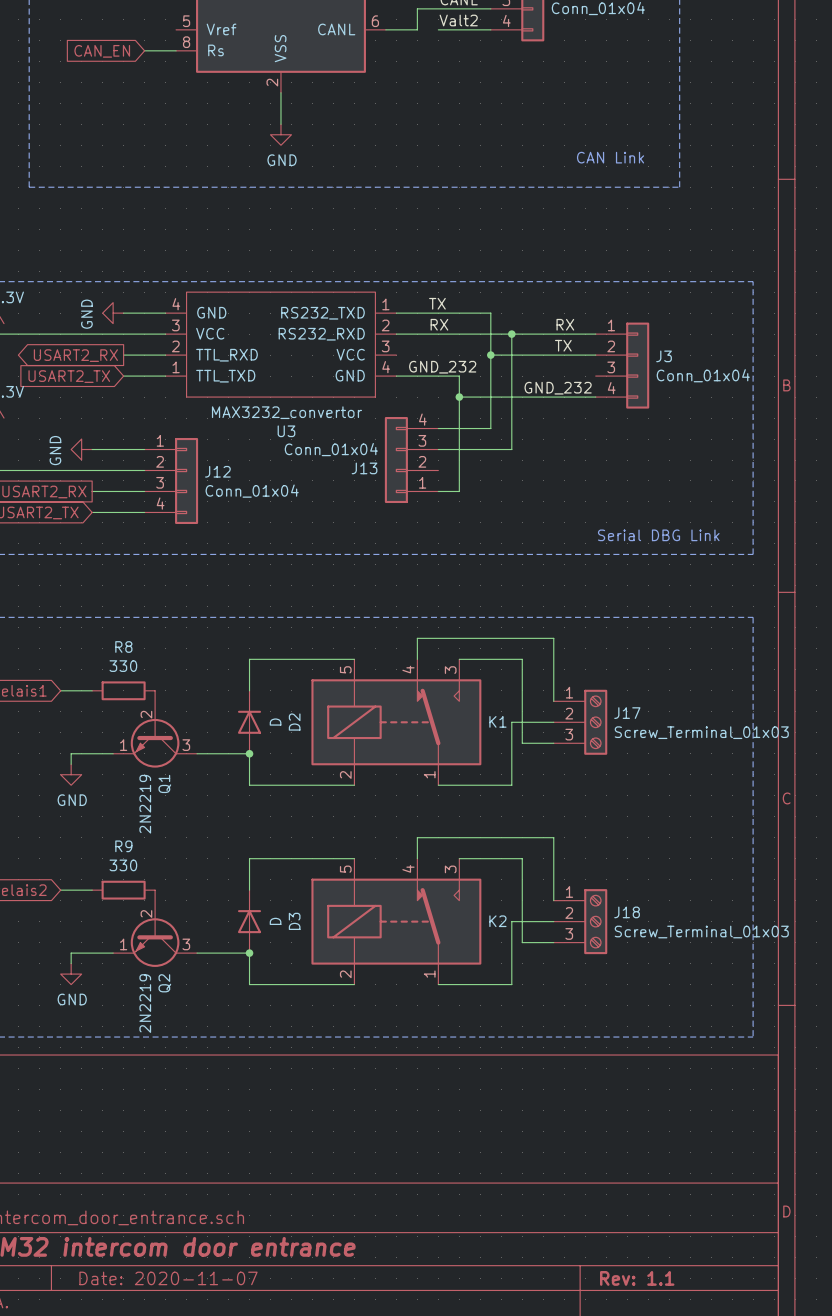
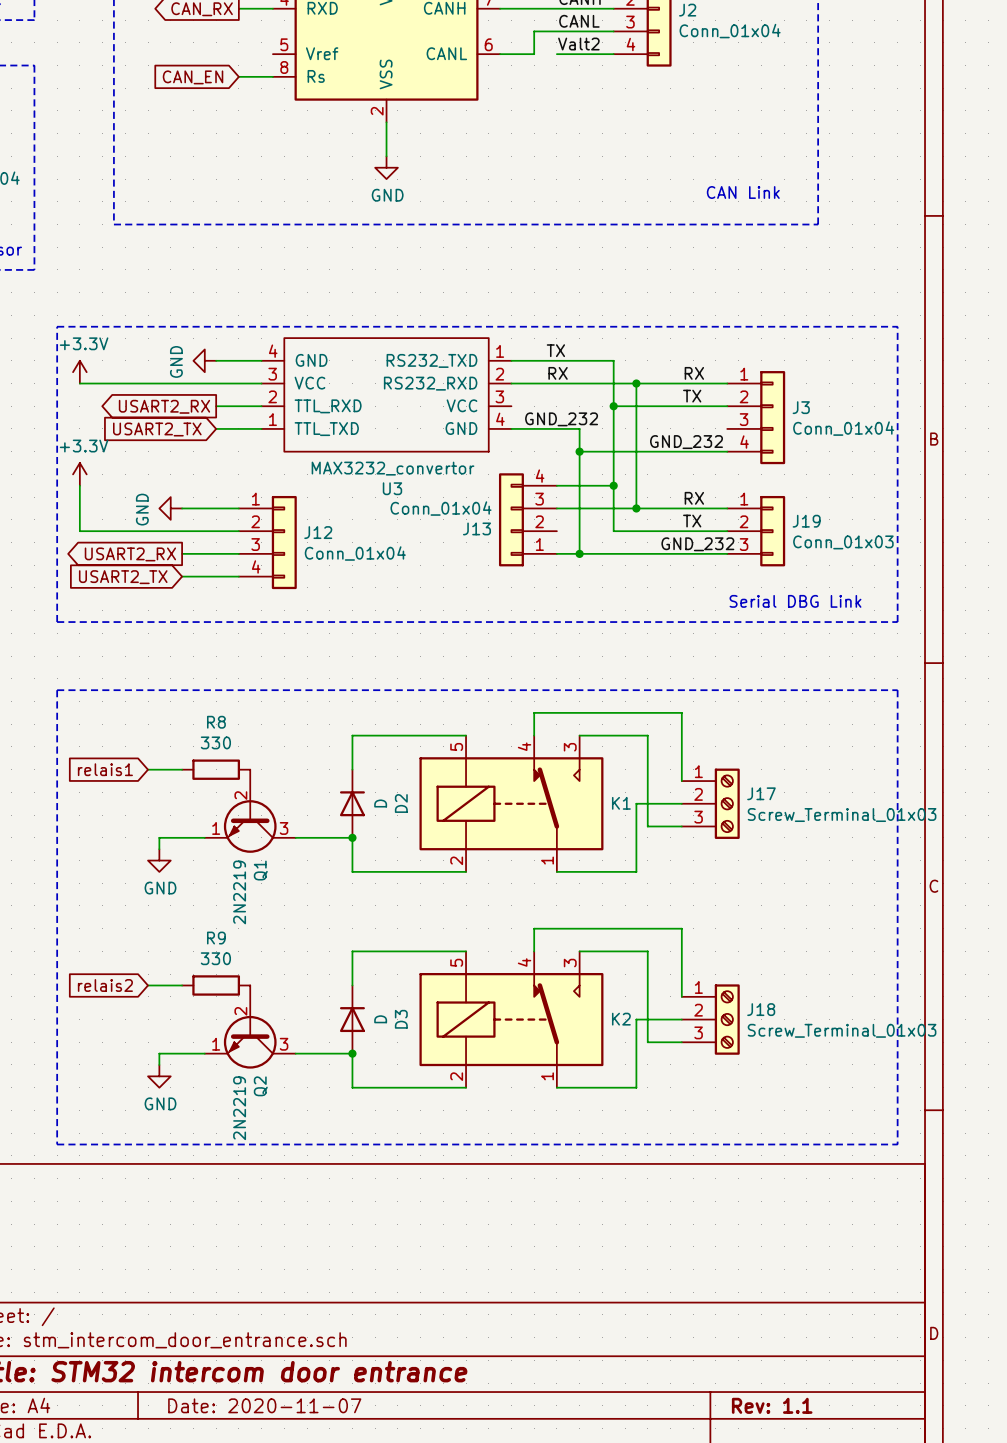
wire: none -> (613, 485) (613, 531) (727, 531)
junction: none -> (613, 485)
label: none -> RX (694, 498)
wire: none -> (636, 508) (727, 508)
junction: none -> (636, 508)
label: none -> TX (692, 521)
J19: none -> Conn_01x03 (756, 531)
label: none -> GND_232 (697, 544)
wire: none -> (579, 553) (727, 553)
junction: none -> (579, 553)

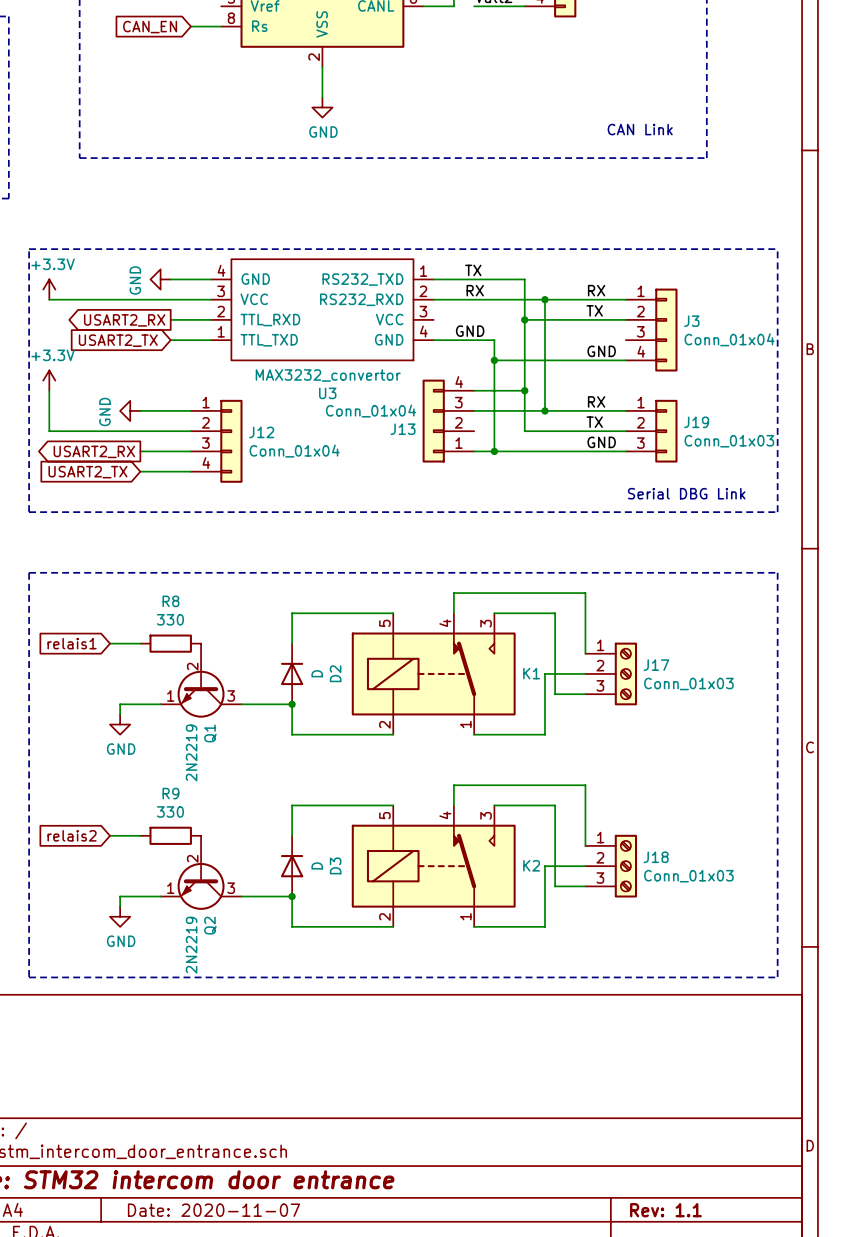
label: none -> GND (470, 331)
label: GND_232 (561, 419) -> none
label: none -> GND (601, 351)
label: GND_232 (686, 442) -> none
label: none -> GND (601, 442)
label: GND_232 (697, 544) -> none
J17 value: Screw_Terminal_01x03 (842, 815) -> Conn_01x03 (688, 683)
J18 value: Screw_Terminal_01x03 (842, 1030) -> Conn_01x03 (688, 876)

